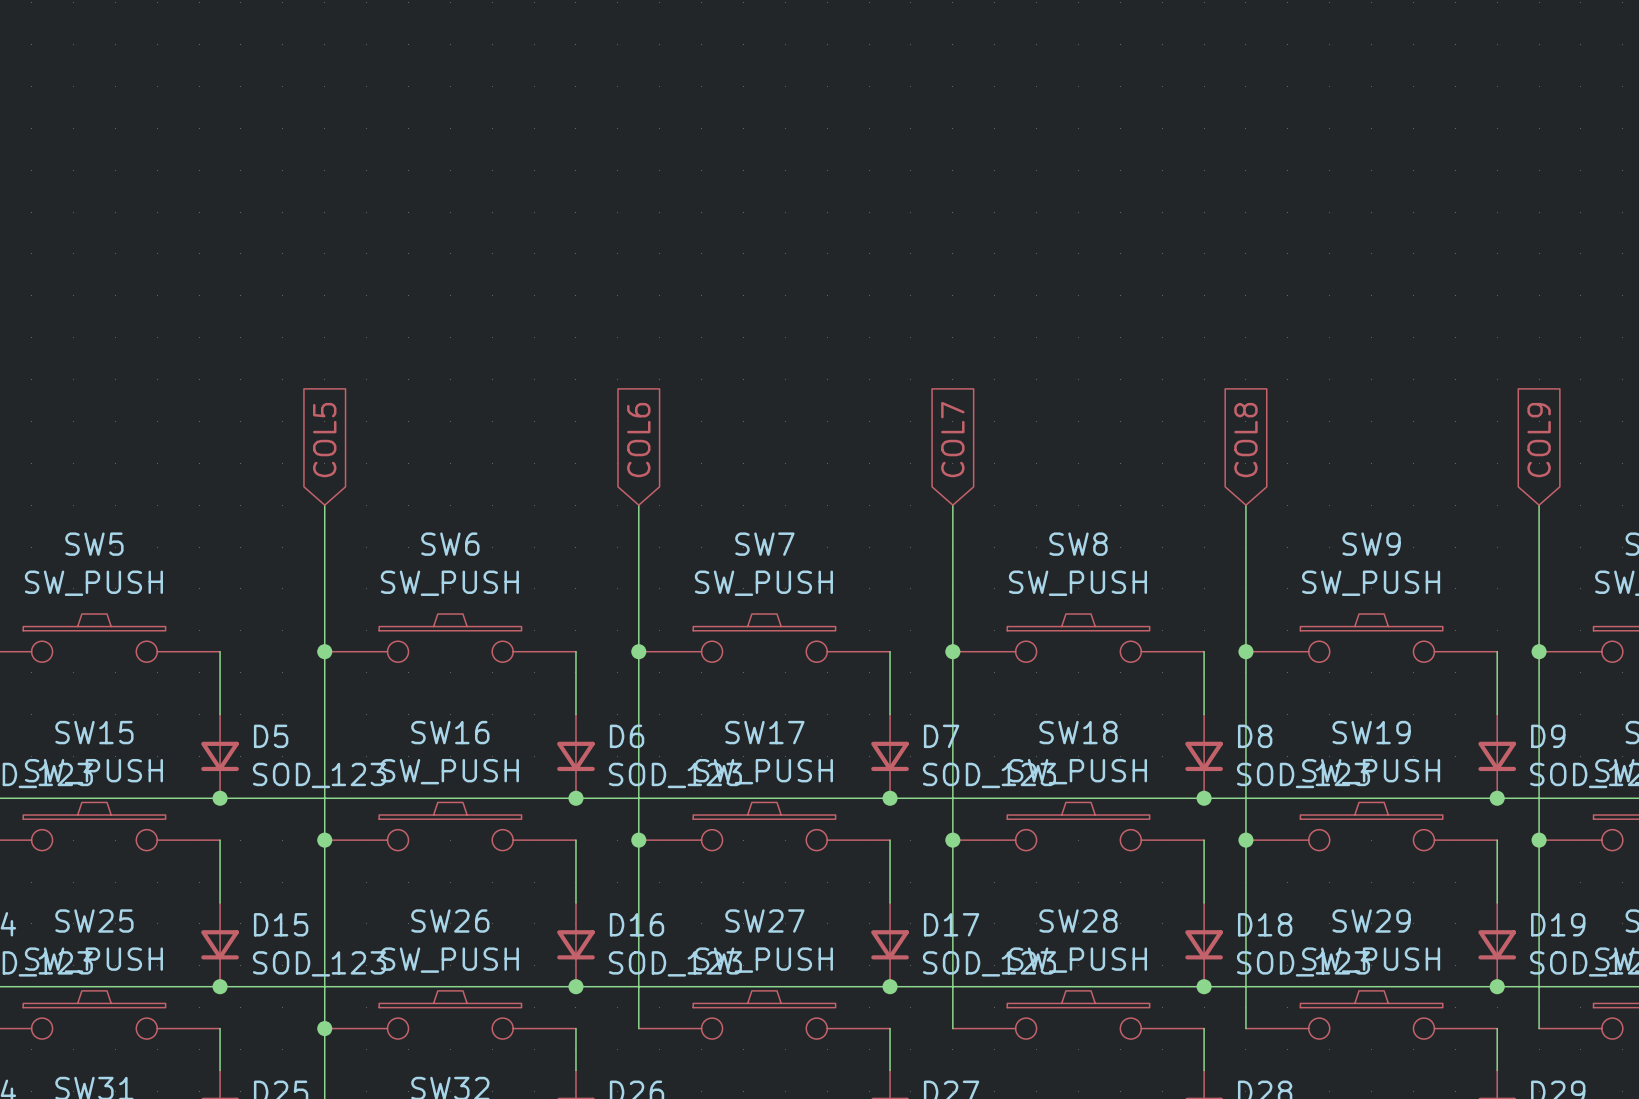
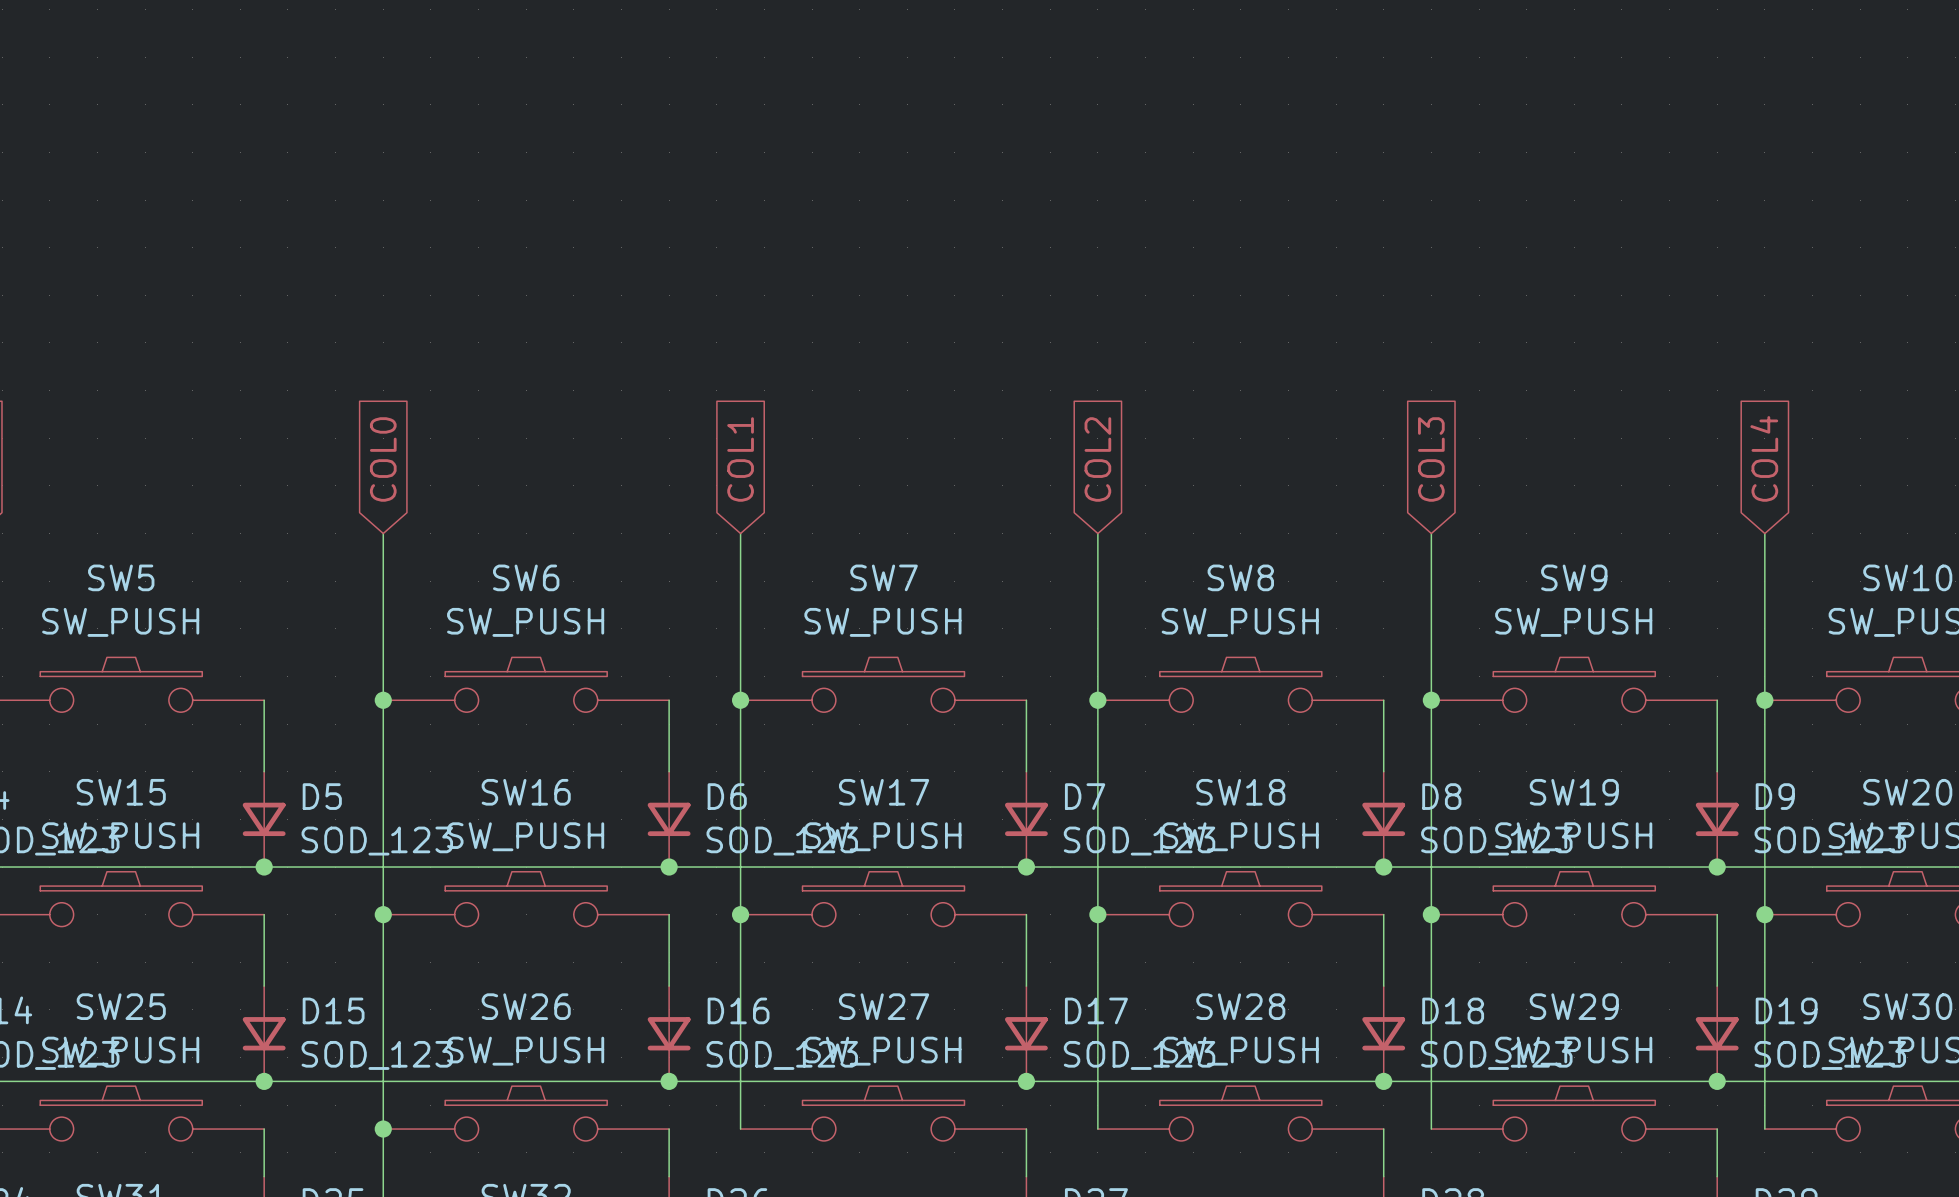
global label: COL7 (952, 439) -> COL2 (1097, 459)
global label: COL5 (324, 440) -> COL0 (383, 459)
global label: COL6 (638, 440) -> COL1 (740, 459)
global label: COL8 (1245, 440) -> COL3 (1431, 459)
global label: COL9 (1539, 440) -> COL4 (1764, 458)

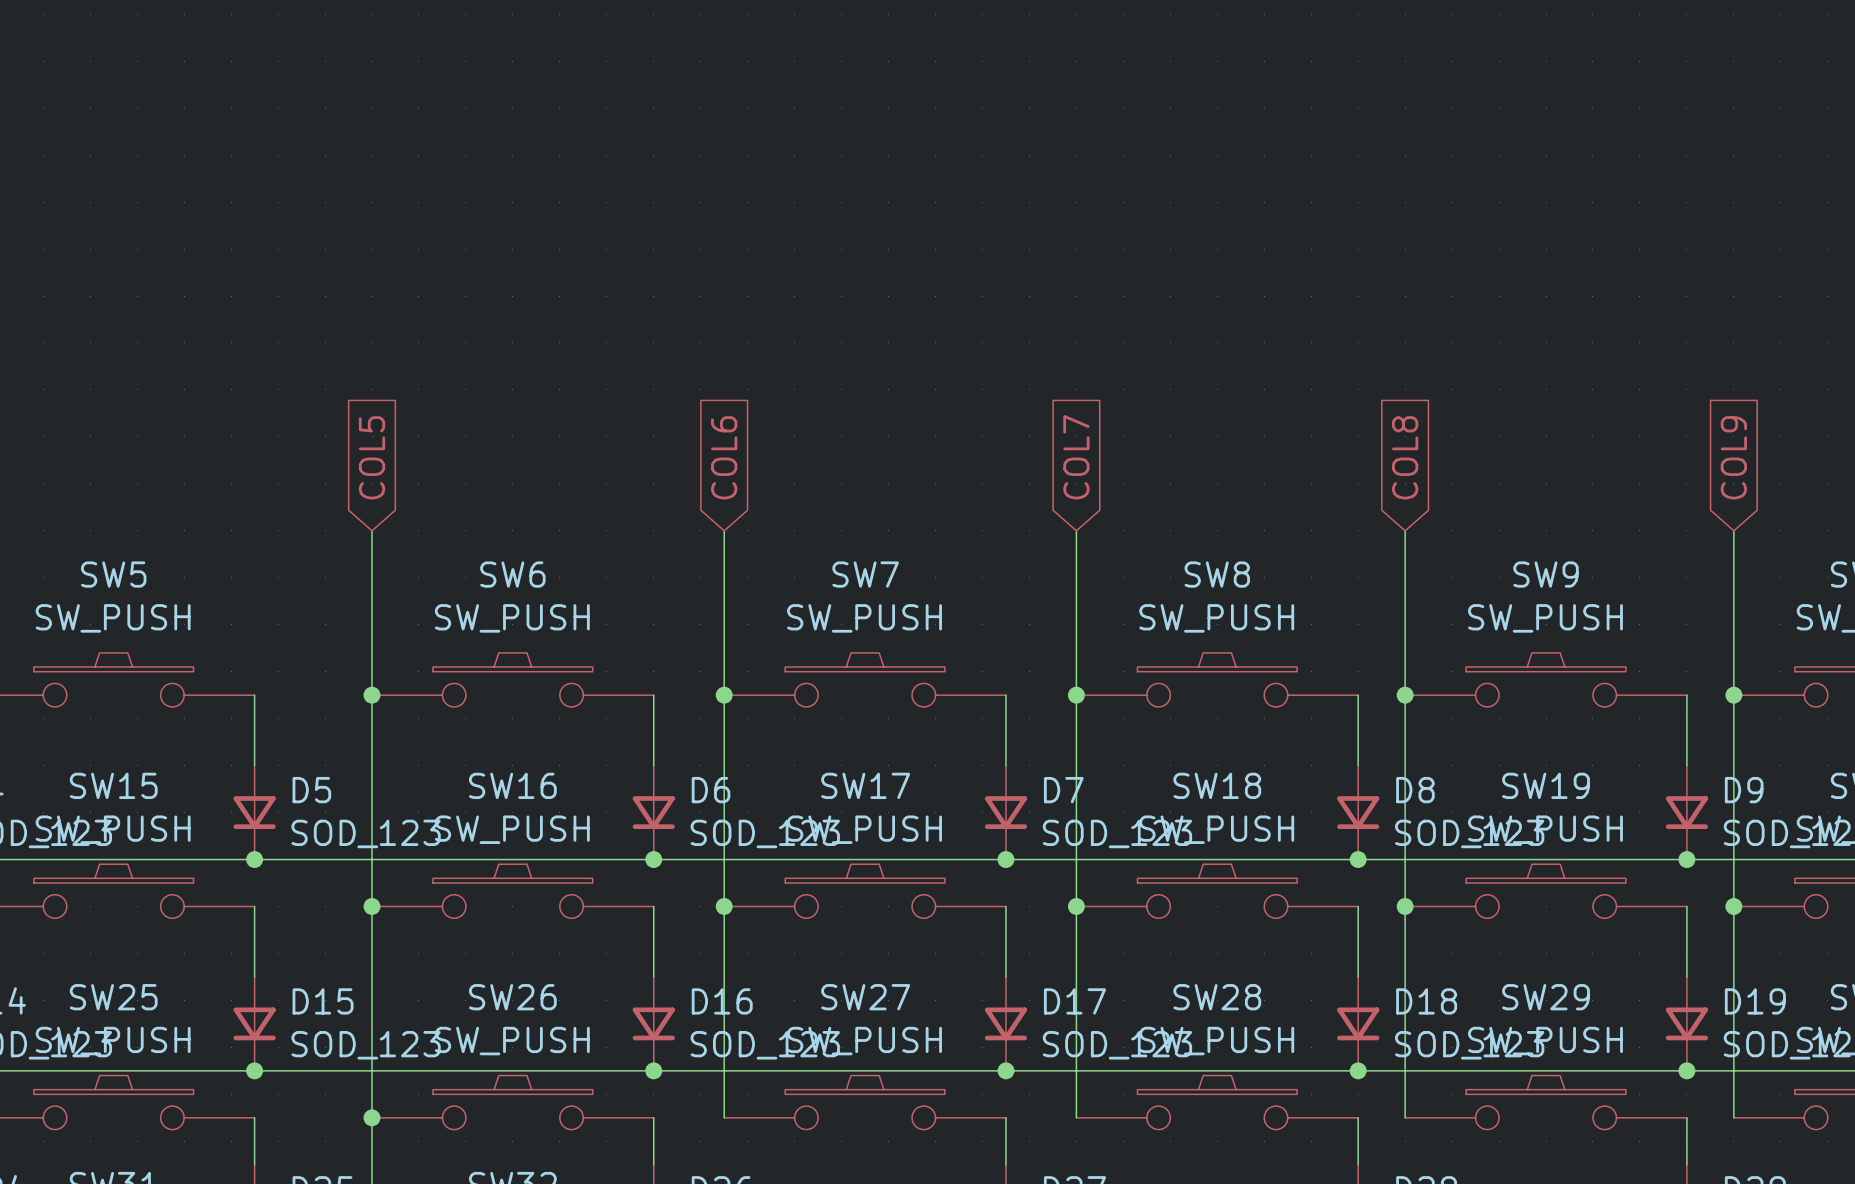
global label: COL4 (1764, 458) -> COL9 (1733, 457)
global label: COL0 (383, 459) -> COL5 (372, 457)
global label: COL1 (740, 459) -> COL6 (724, 457)
global label: COL2 (1097, 459) -> COL7 (1076, 457)
global label: COL3 (1431, 459) -> COL8 (1405, 457)

